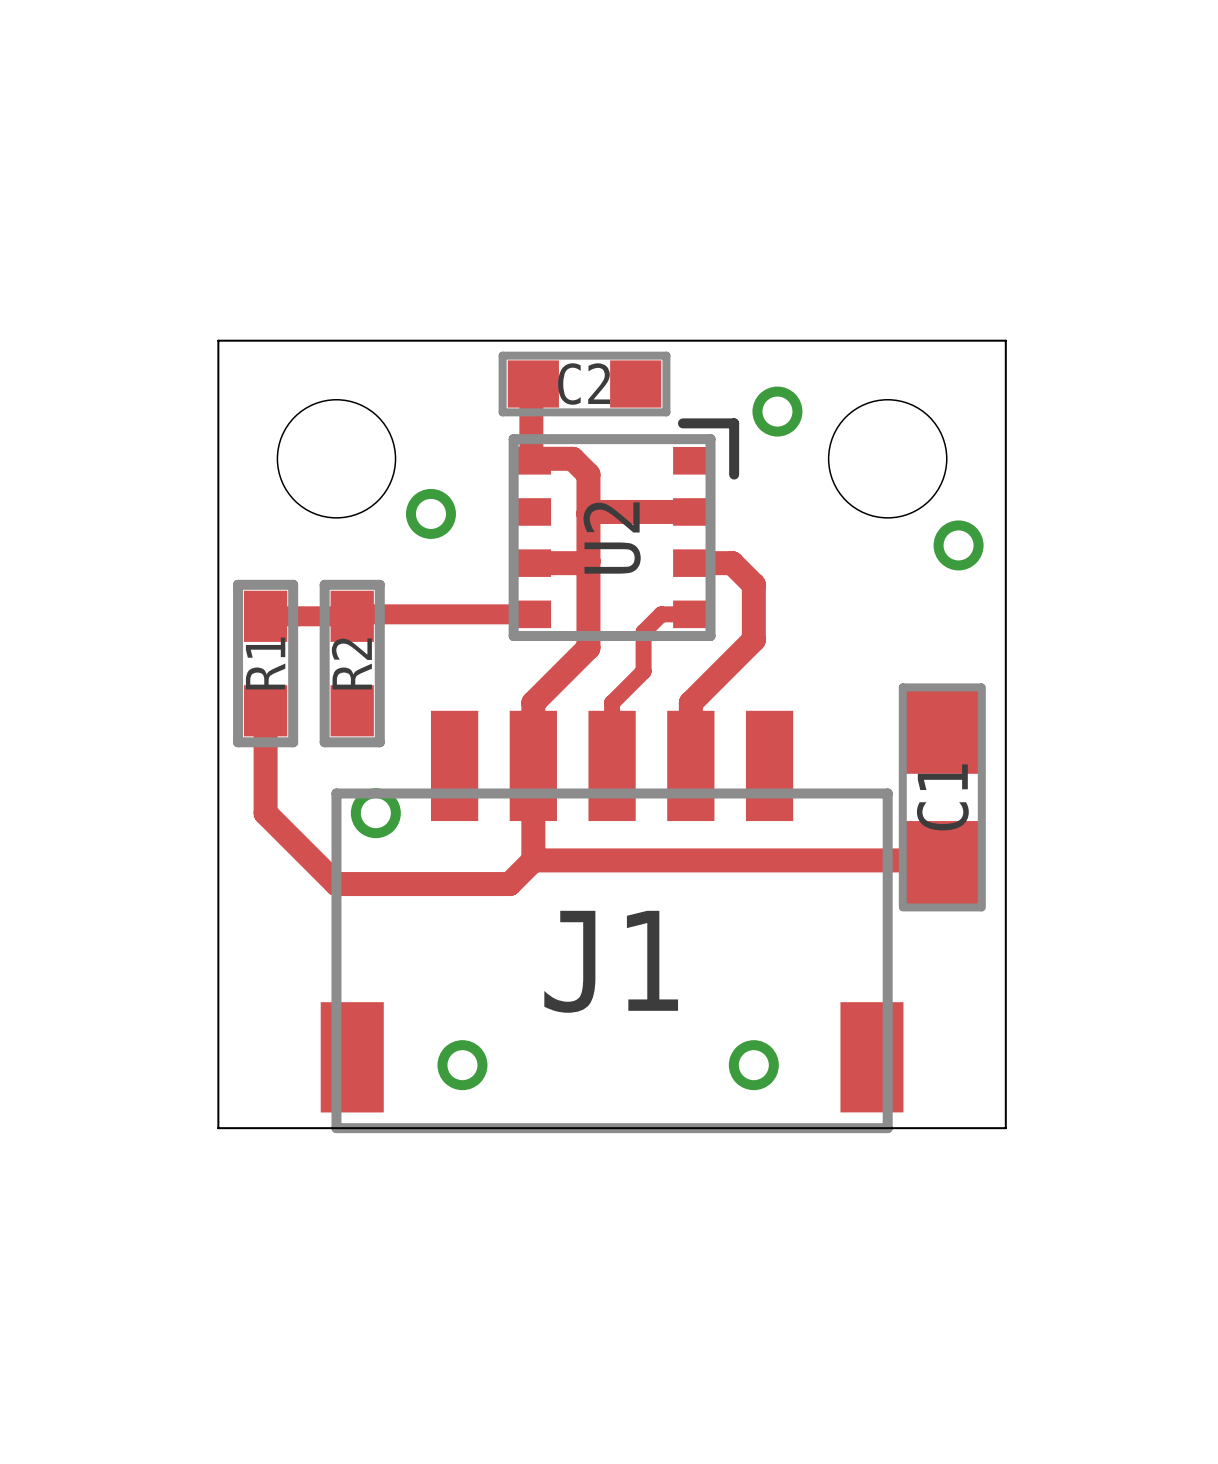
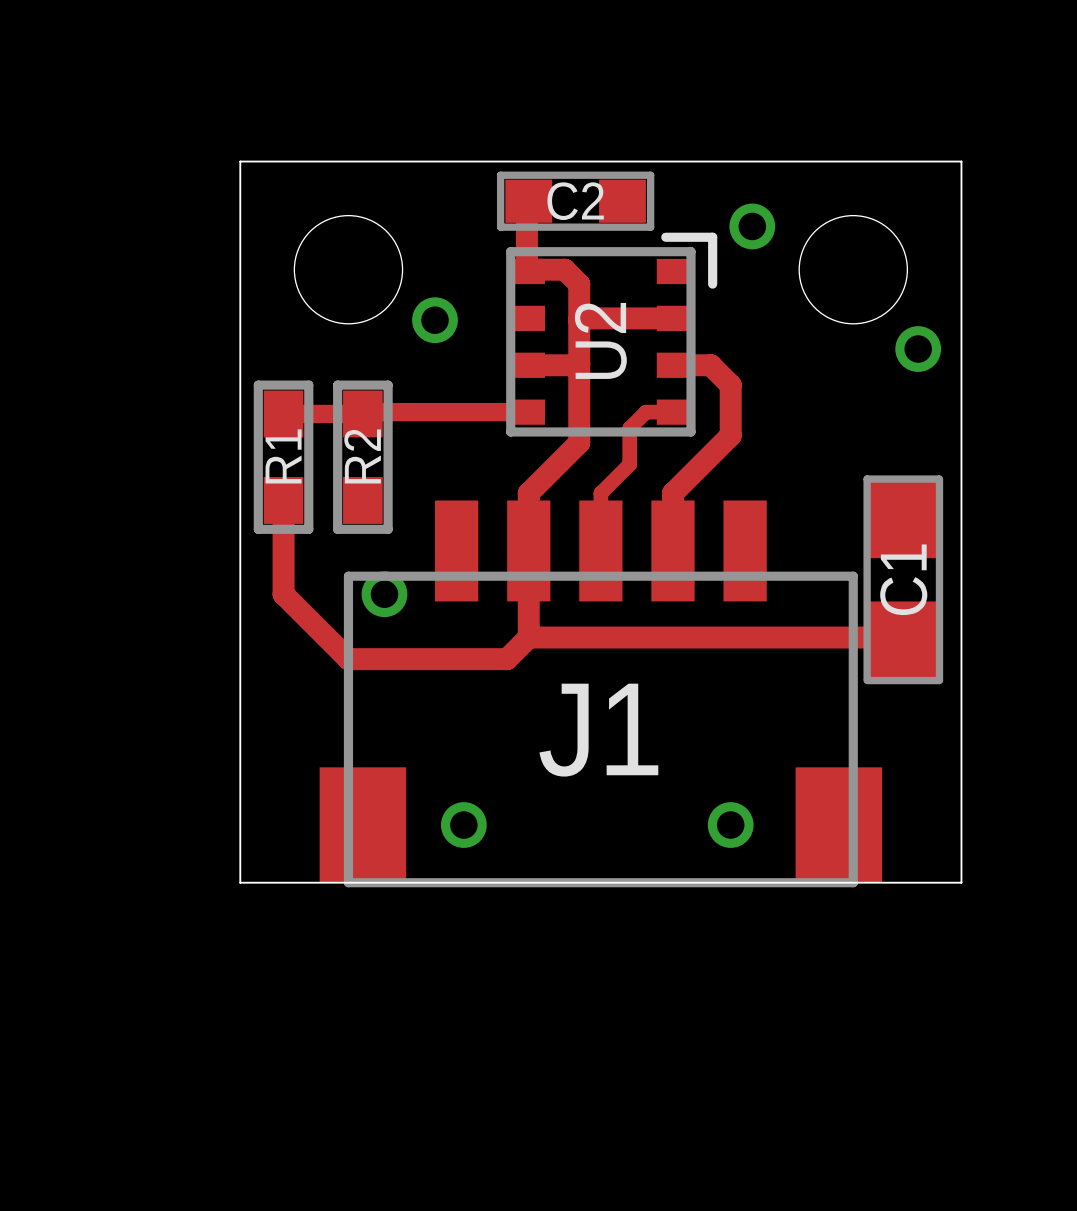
J1 footprint: [320, 710, 904, 1134] -> [319, 500, 883, 888]

